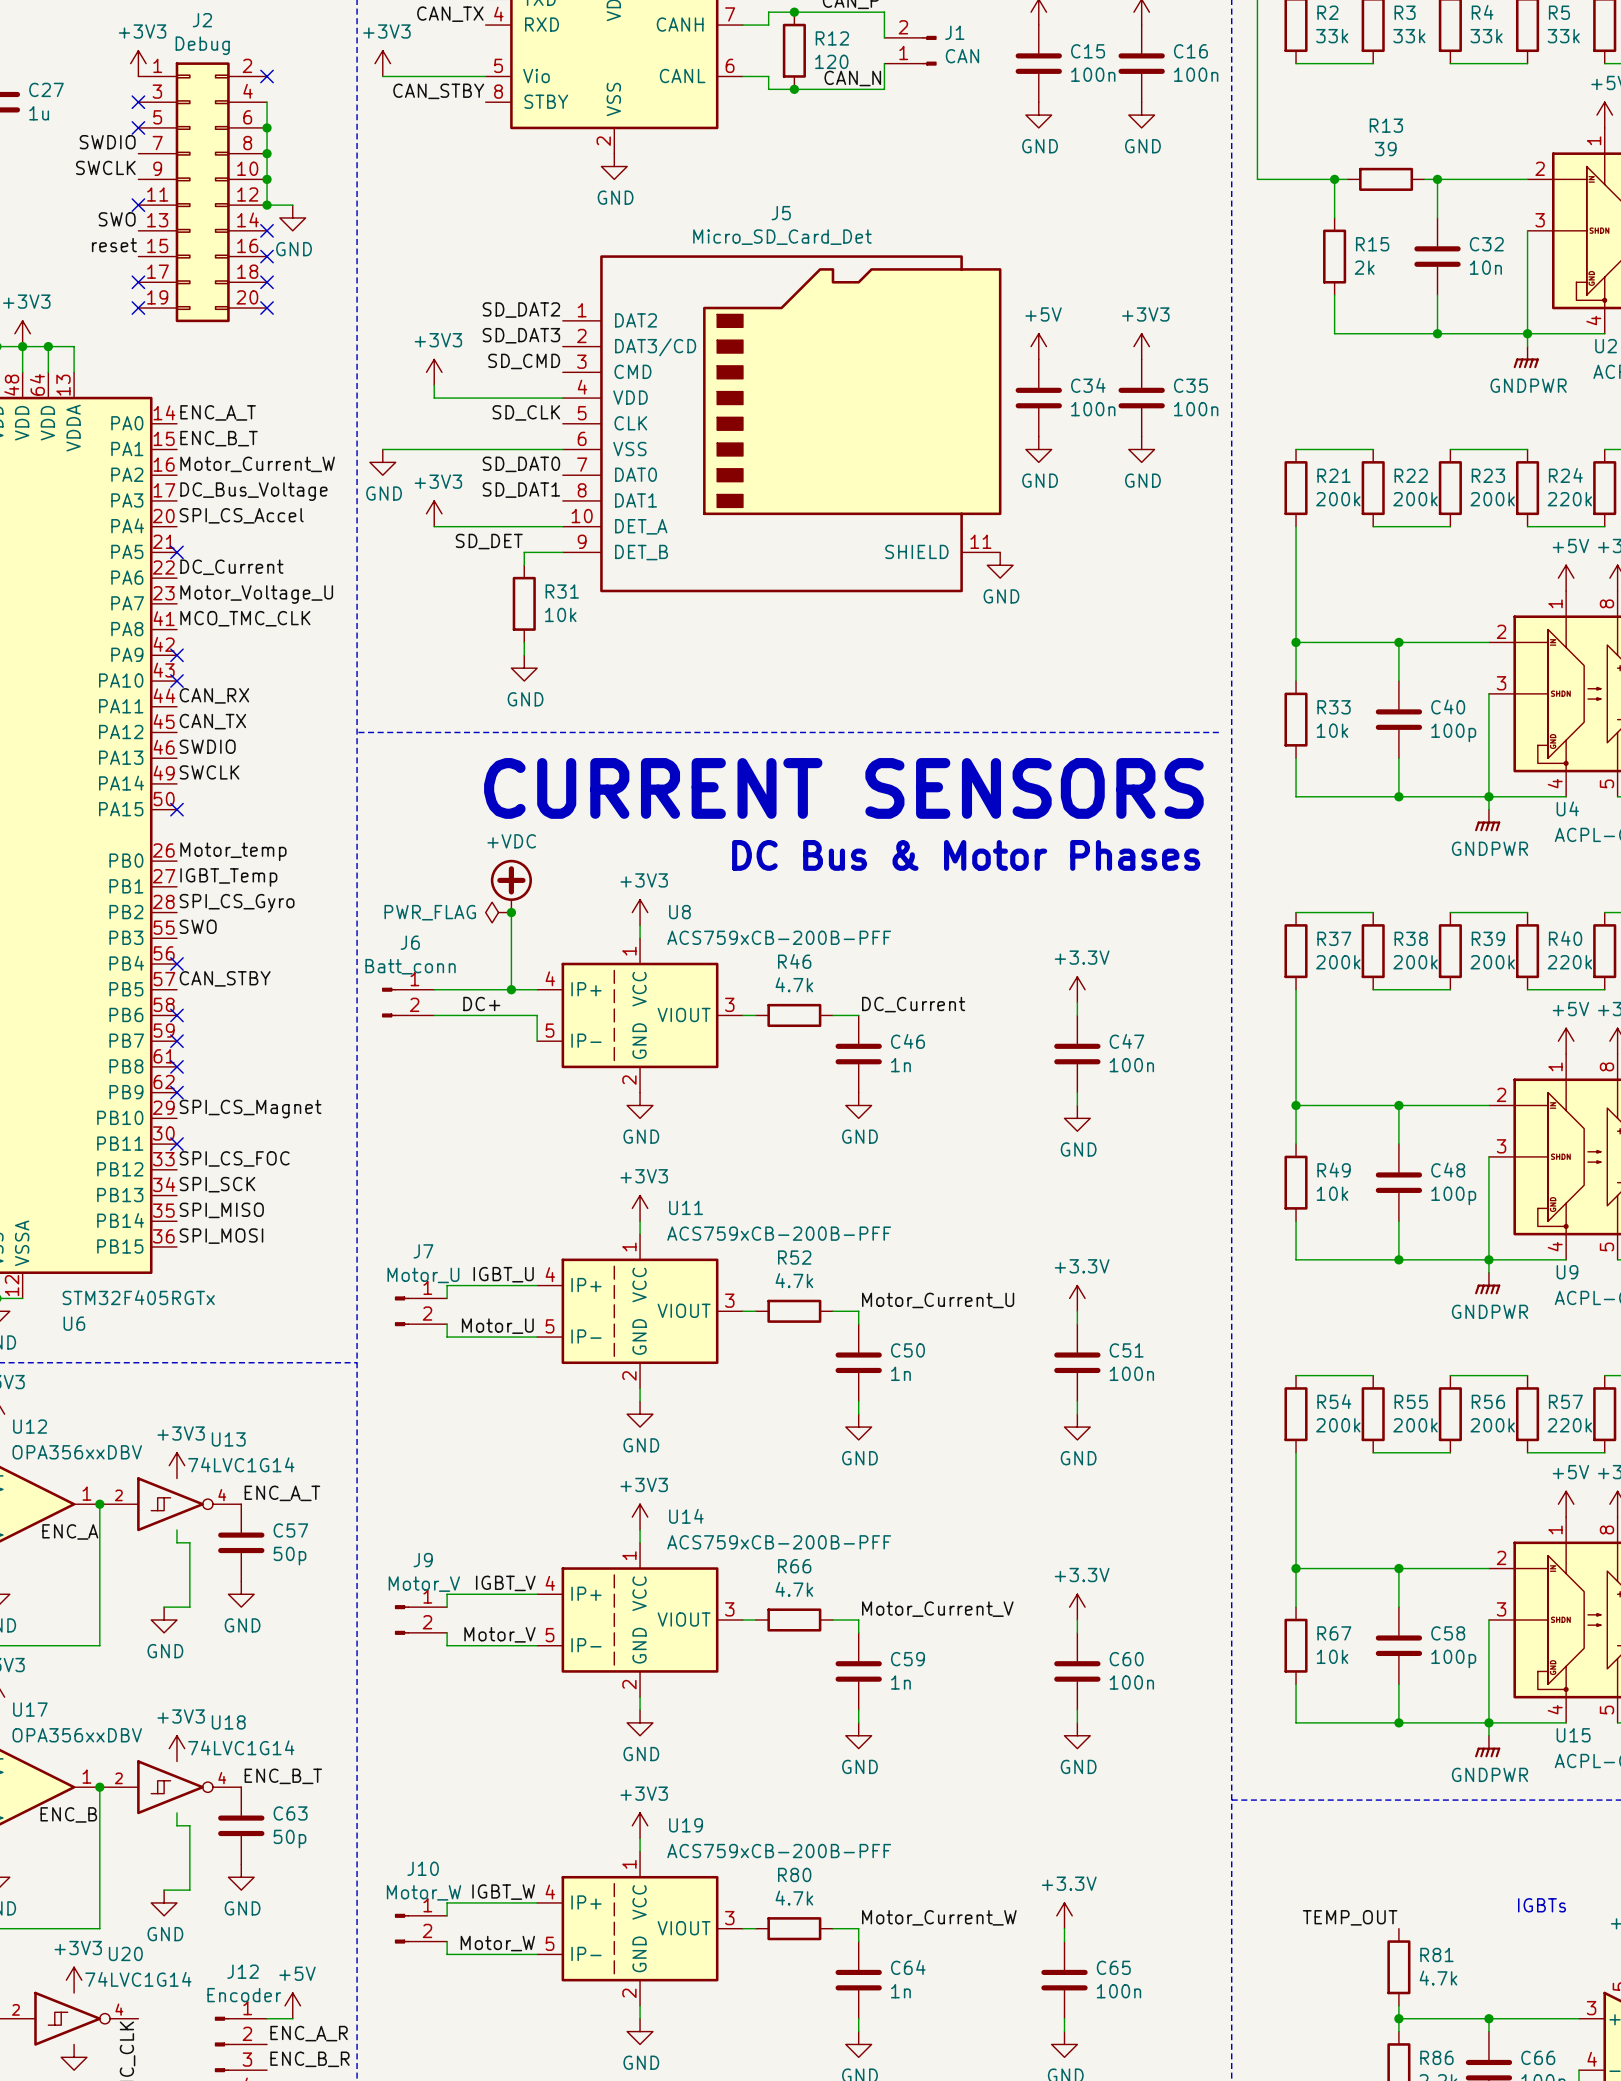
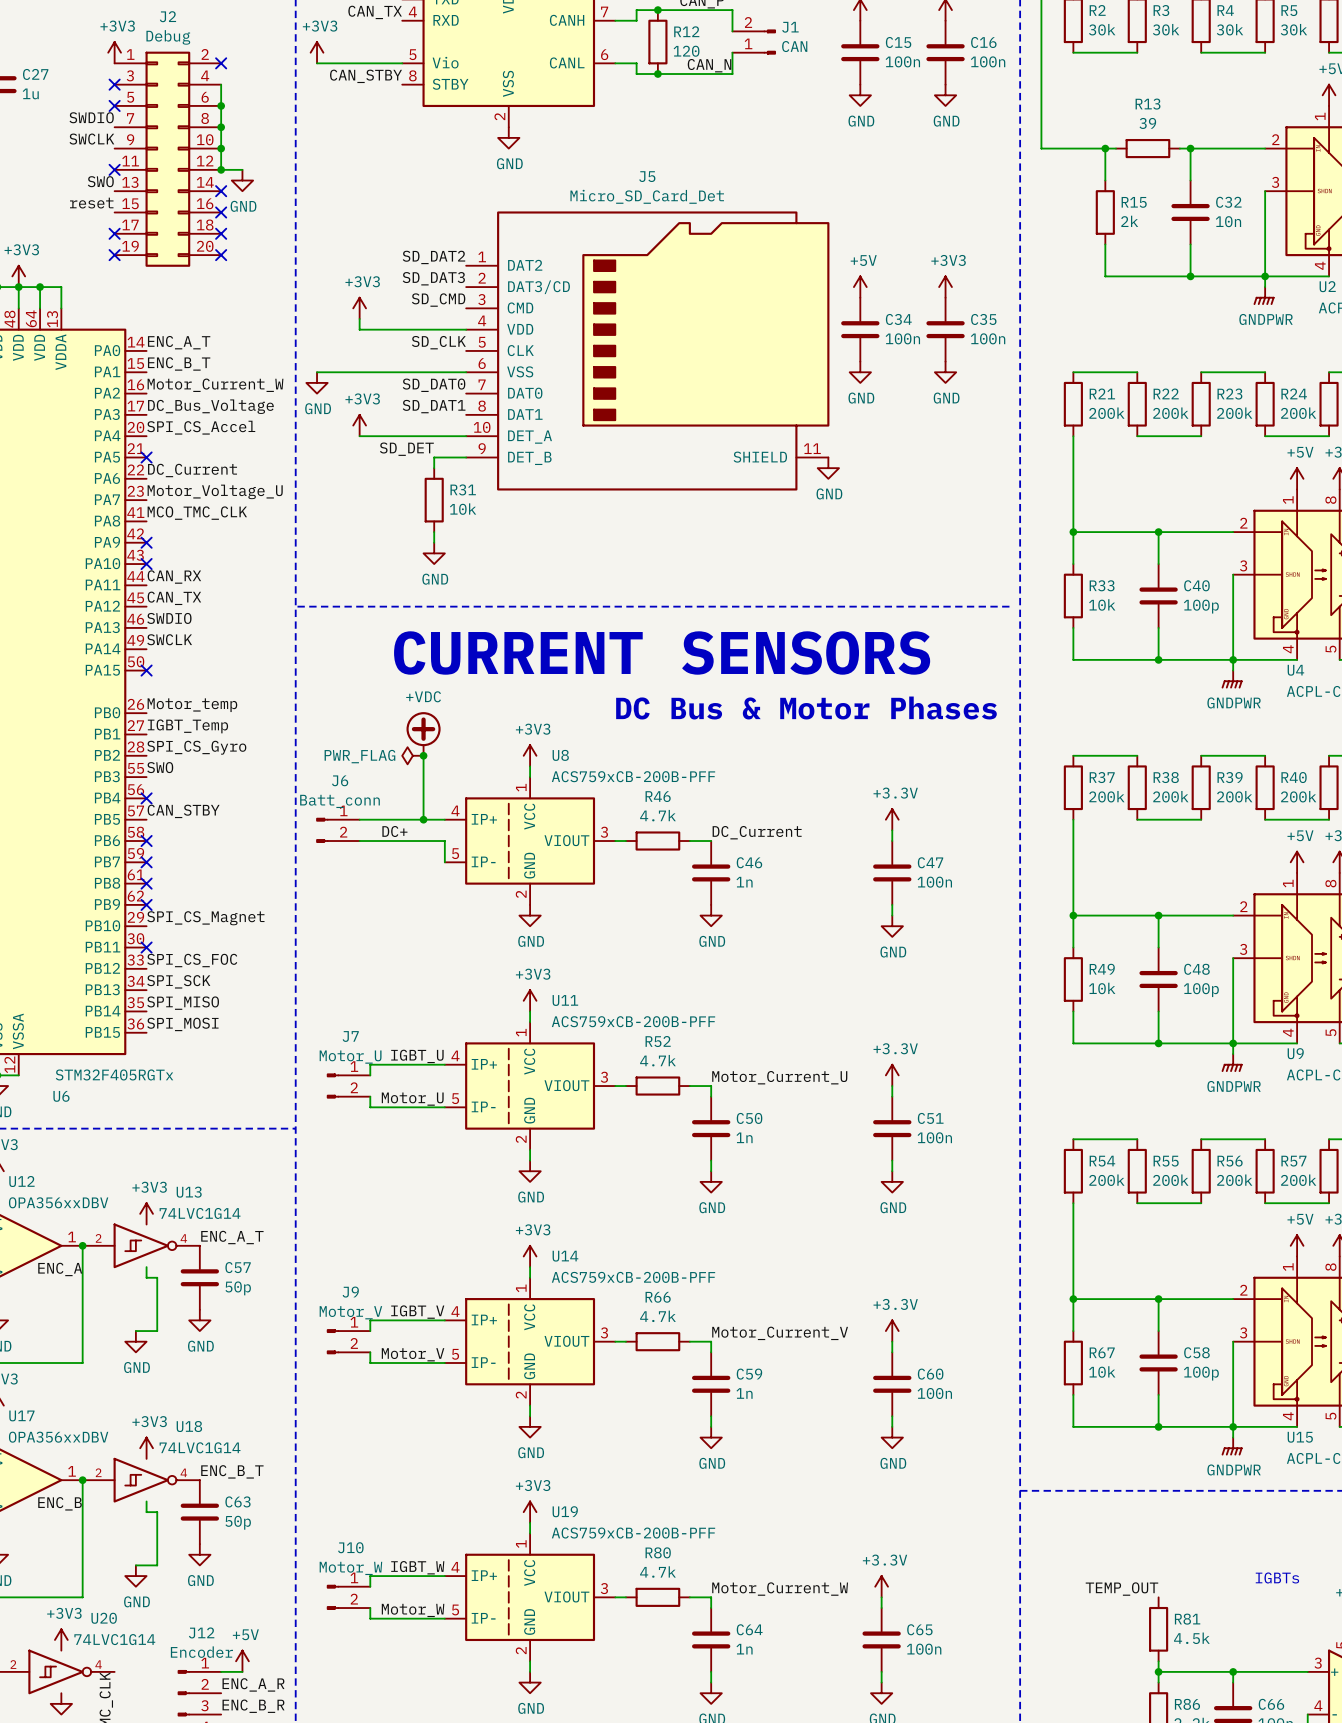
R2 value: 33k (1332, 36) -> 30k (1102, 29)
R3 value: 33k (1409, 36) -> 30k (1166, 29)
R4 value: 33k (1486, 36) -> 30k (1230, 29)
R5 value: 33k (1563, 36) -> 30k (1293, 29)
R24 value: 220k (1569, 499) -> 200k (1298, 413)
R40 value: 220k (1569, 962) -> 200k (1298, 796)
R57 value: 220k (1569, 1425) -> 200k (1298, 1180)
R81 value: 4.7k (1438, 1978) -> 4.5k (1191, 1638)

